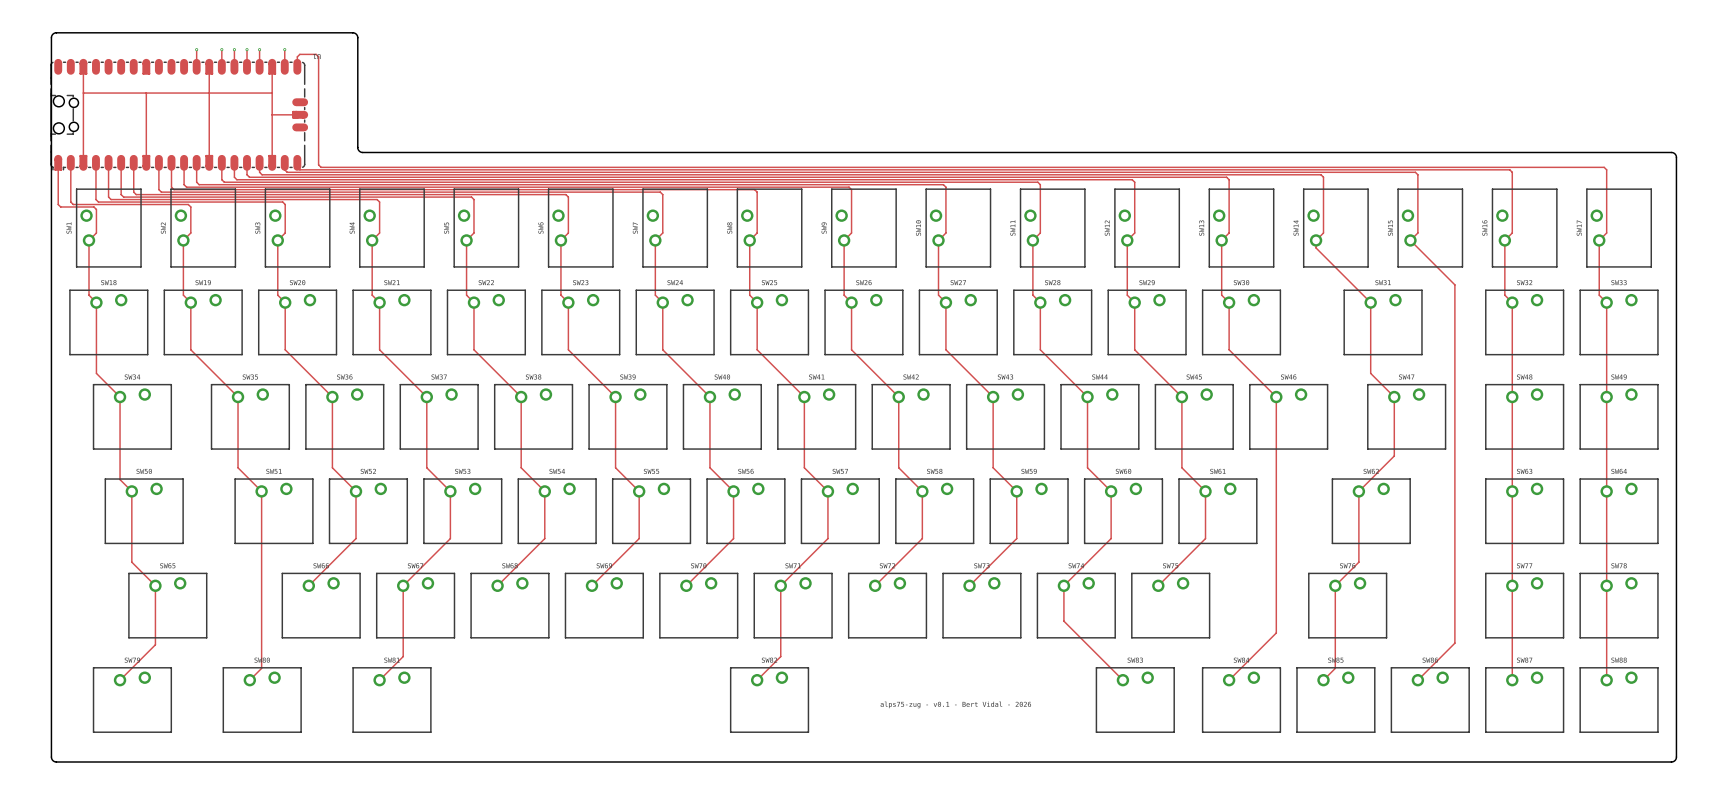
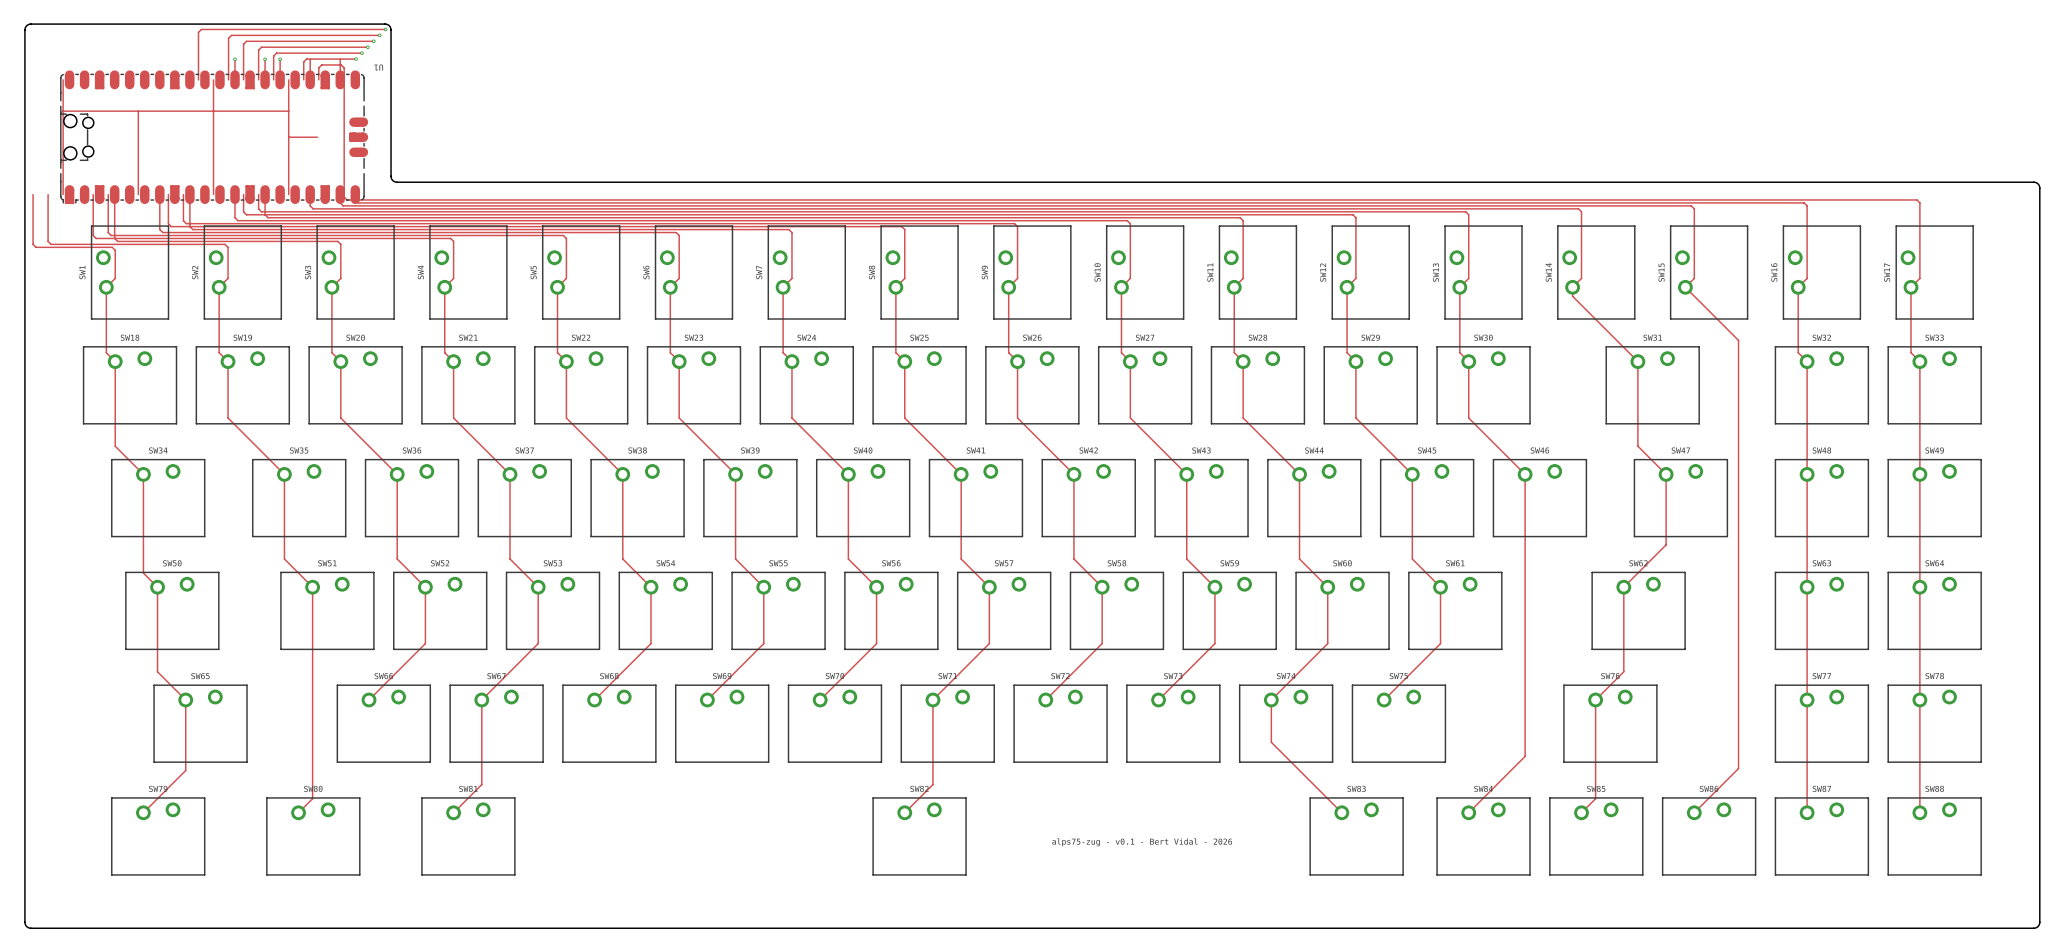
track: none -> (385, 29) (201, 29) (198, 32) (198, 79)
via: none -> (385, 29)
track: none -> (379, 35) (231, 35) (228, 38) (228, 79)
via: none -> (379, 35)
track: none -> (373, 41) (246, 41) (243, 44) (243, 79)
via: none -> (373, 41)
track: none -> (367, 47) (261, 47) (258, 50) (258, 79)
via: none -> (367, 47)
track: none -> (361, 53) (276, 53) (273, 56) (273, 79)
via: none -> (361, 53)
track: (247, 49) (247, 66) -> none
via: (247, 49) -> none
via: (259, 49) -> none
via: (284, 49) -> none
track: none -> (356, 59) (306, 59) (303, 62) (303, 79)
via: none -> (356, 59)
track: (83, 66) (83, 162) -> (63, 79) (63, 194)
track: (209, 66) (209, 162) -> (213, 79) (213, 194)
track: (272, 66) (272, 162) -> (288, 79) (288, 194)
track: (297, 66) (297, 56) (299, 54) (316, 54) (318, 56) (318, 164) (321, 167) -> (318, 79) (318, 67) (321, 64) (341, 64) (344, 67) (344, 197) (347, 199) (383, 199)
track: none -> (63, 111) (99, 111)
track: (146, 93) (146, 162) -> (138, 111) (138, 194)
track: (241, 93) (272, 93) -> none
track: (272, 114) (296, 114) -> (288, 137) (317, 137)
board edge: (362, 152) (357, 148) (357, 37) (354, 33) (56, 32) (52, 35) (51, 757) (53, 761) (1673, 761) (1676, 757) (1676, 157) (1671, 152) -> (433, 182) (396, 182) (391, 178) (391, 29) (387, 24) (30, 24) (25, 27) (24, 922) (27, 927) (2036, 927) (2039, 922) (2039, 188) (2034, 182) (1997, 182)
track: (58, 162) (58, 204) (60, 206) -> (33, 194) (33, 244) (36, 247) (72, 247)
track: (70, 162) (70, 202) (73, 204) -> (48, 194) (48, 241) (51, 244) (87, 244)
track: (108, 162) (108, 197) (111, 199) -> (93, 194) (93, 235) (96, 238) (132, 238)
track: (121, 162) (121, 194) (123, 197) -> (108, 194) (108, 232) (111, 235) (147, 235)
track: (171, 162) (171, 187) (173, 189) -> (168, 194) (168, 223) (171, 226) (207, 226)
track: (184, 162) (184, 184) (186, 187) -> (183, 194) (183, 220) (186, 223) (222, 223)
track: (234, 162) (234, 177) (236, 179) -> (243, 194) (243, 211) (246, 214) (283, 214)
track: (247, 162) (247, 174) (249, 177) -> (258, 194) (258, 208) (261, 211) (298, 211)

